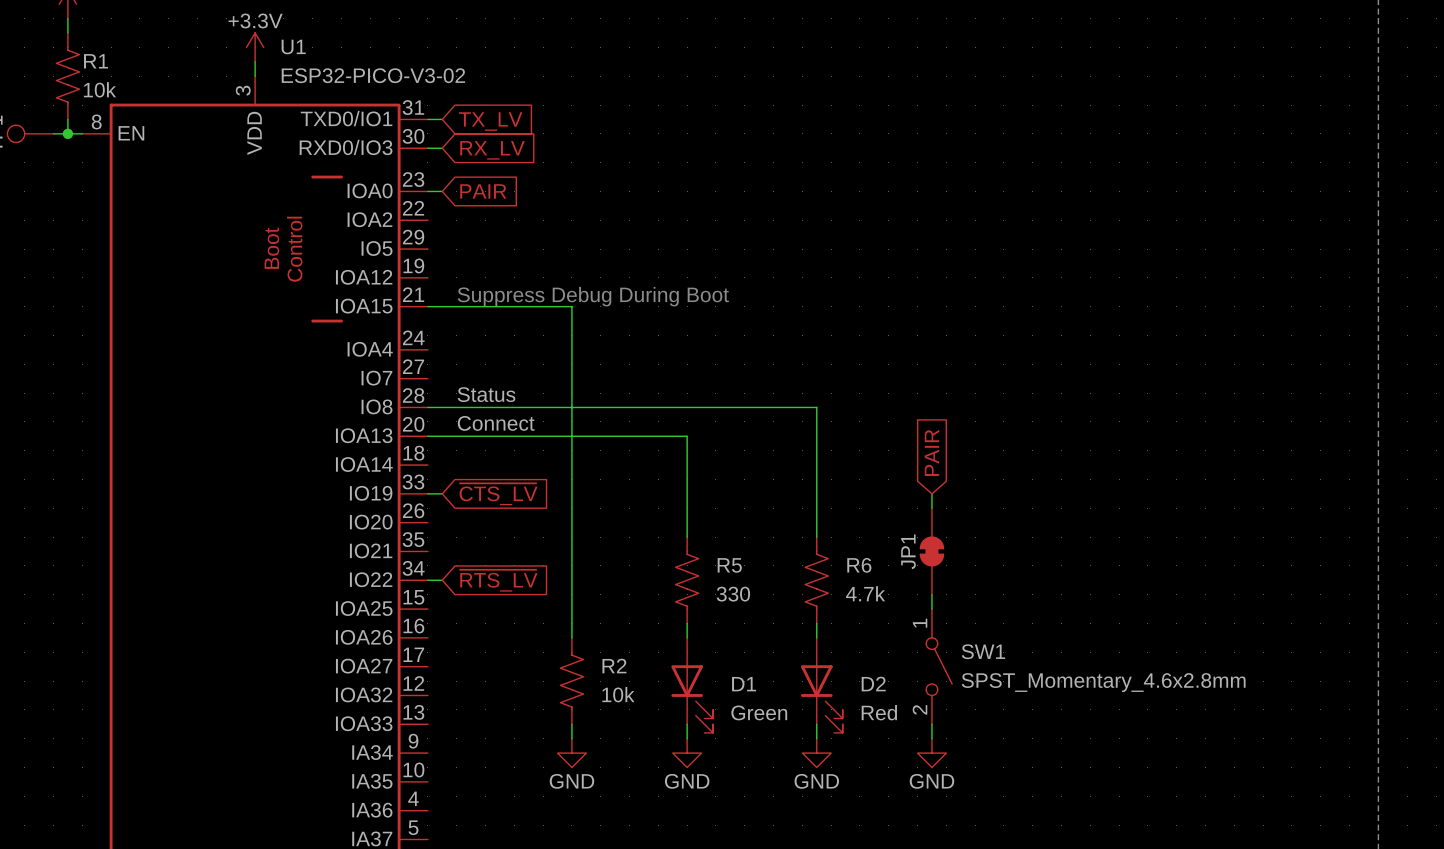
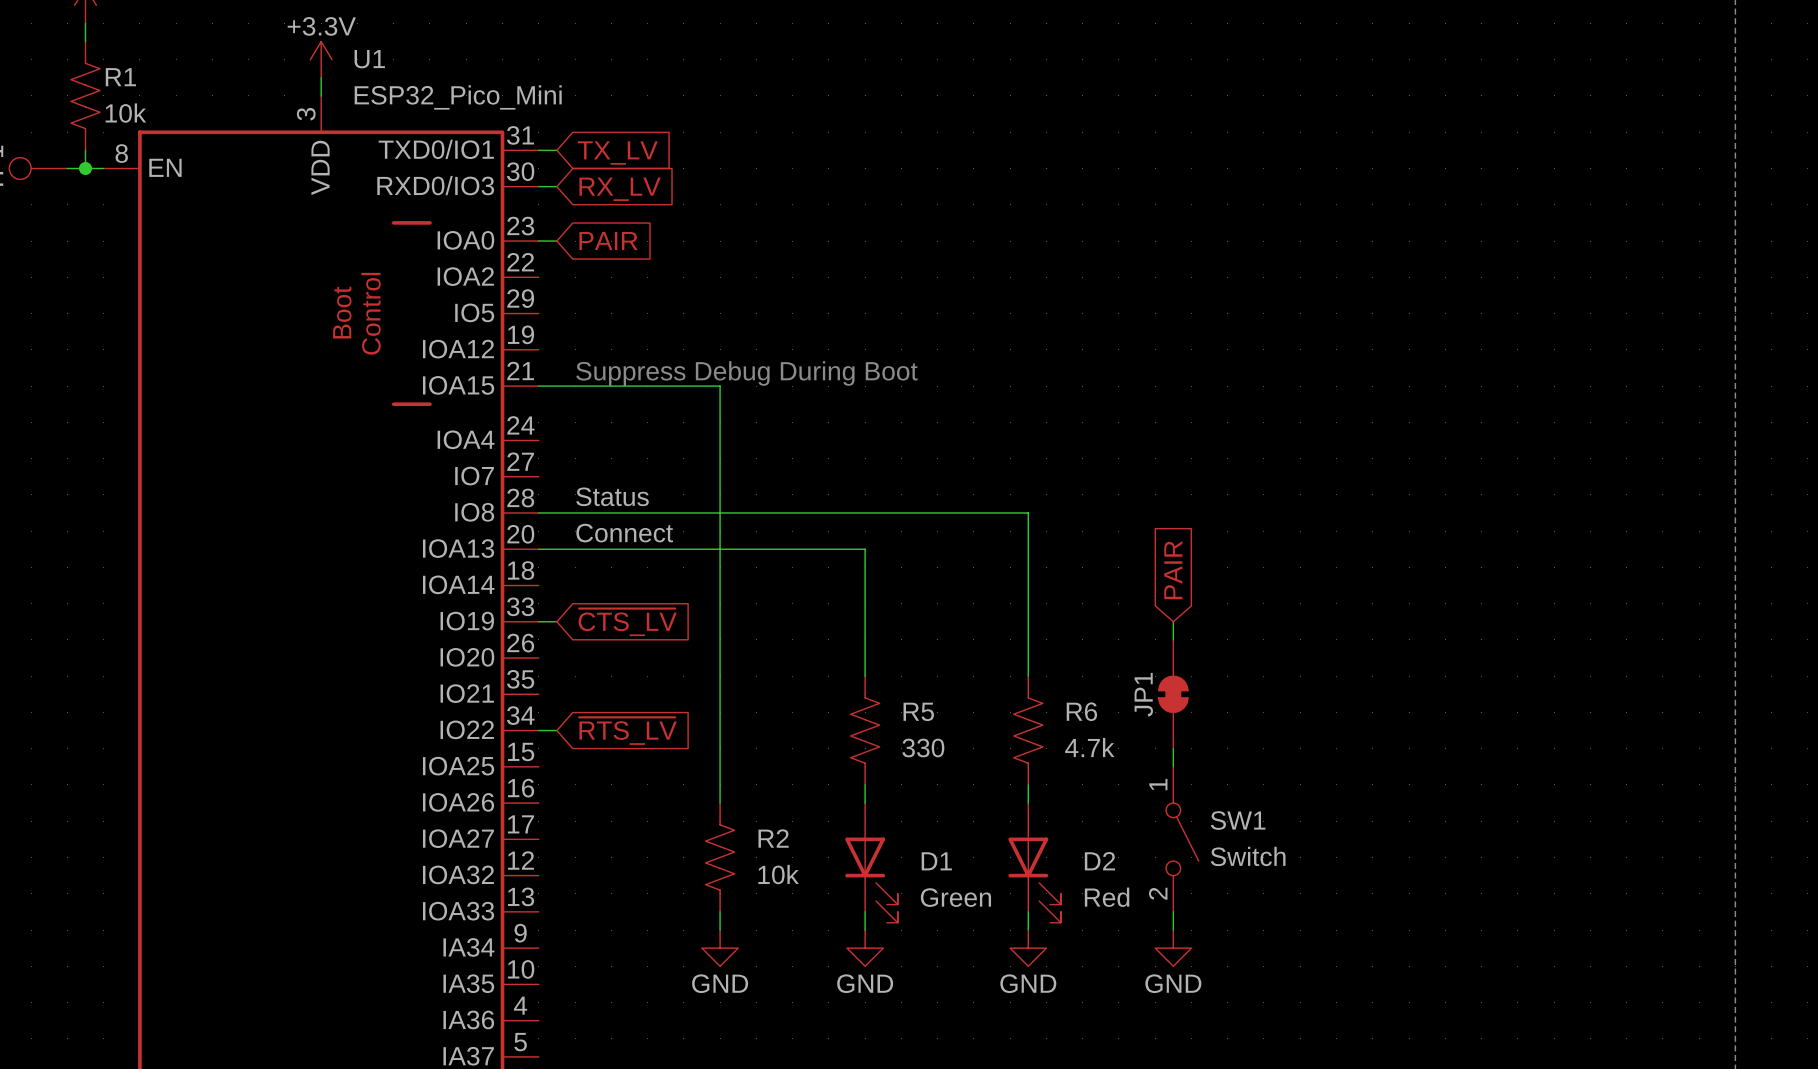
U1 value: ESP32-PICO-V3-02 (373, 75) -> ESP32_Pico_Mini (458, 97)
SW1 value: SPST_Momentary_4.6x2.8mm (1103, 682) -> Switch (1248, 856)

